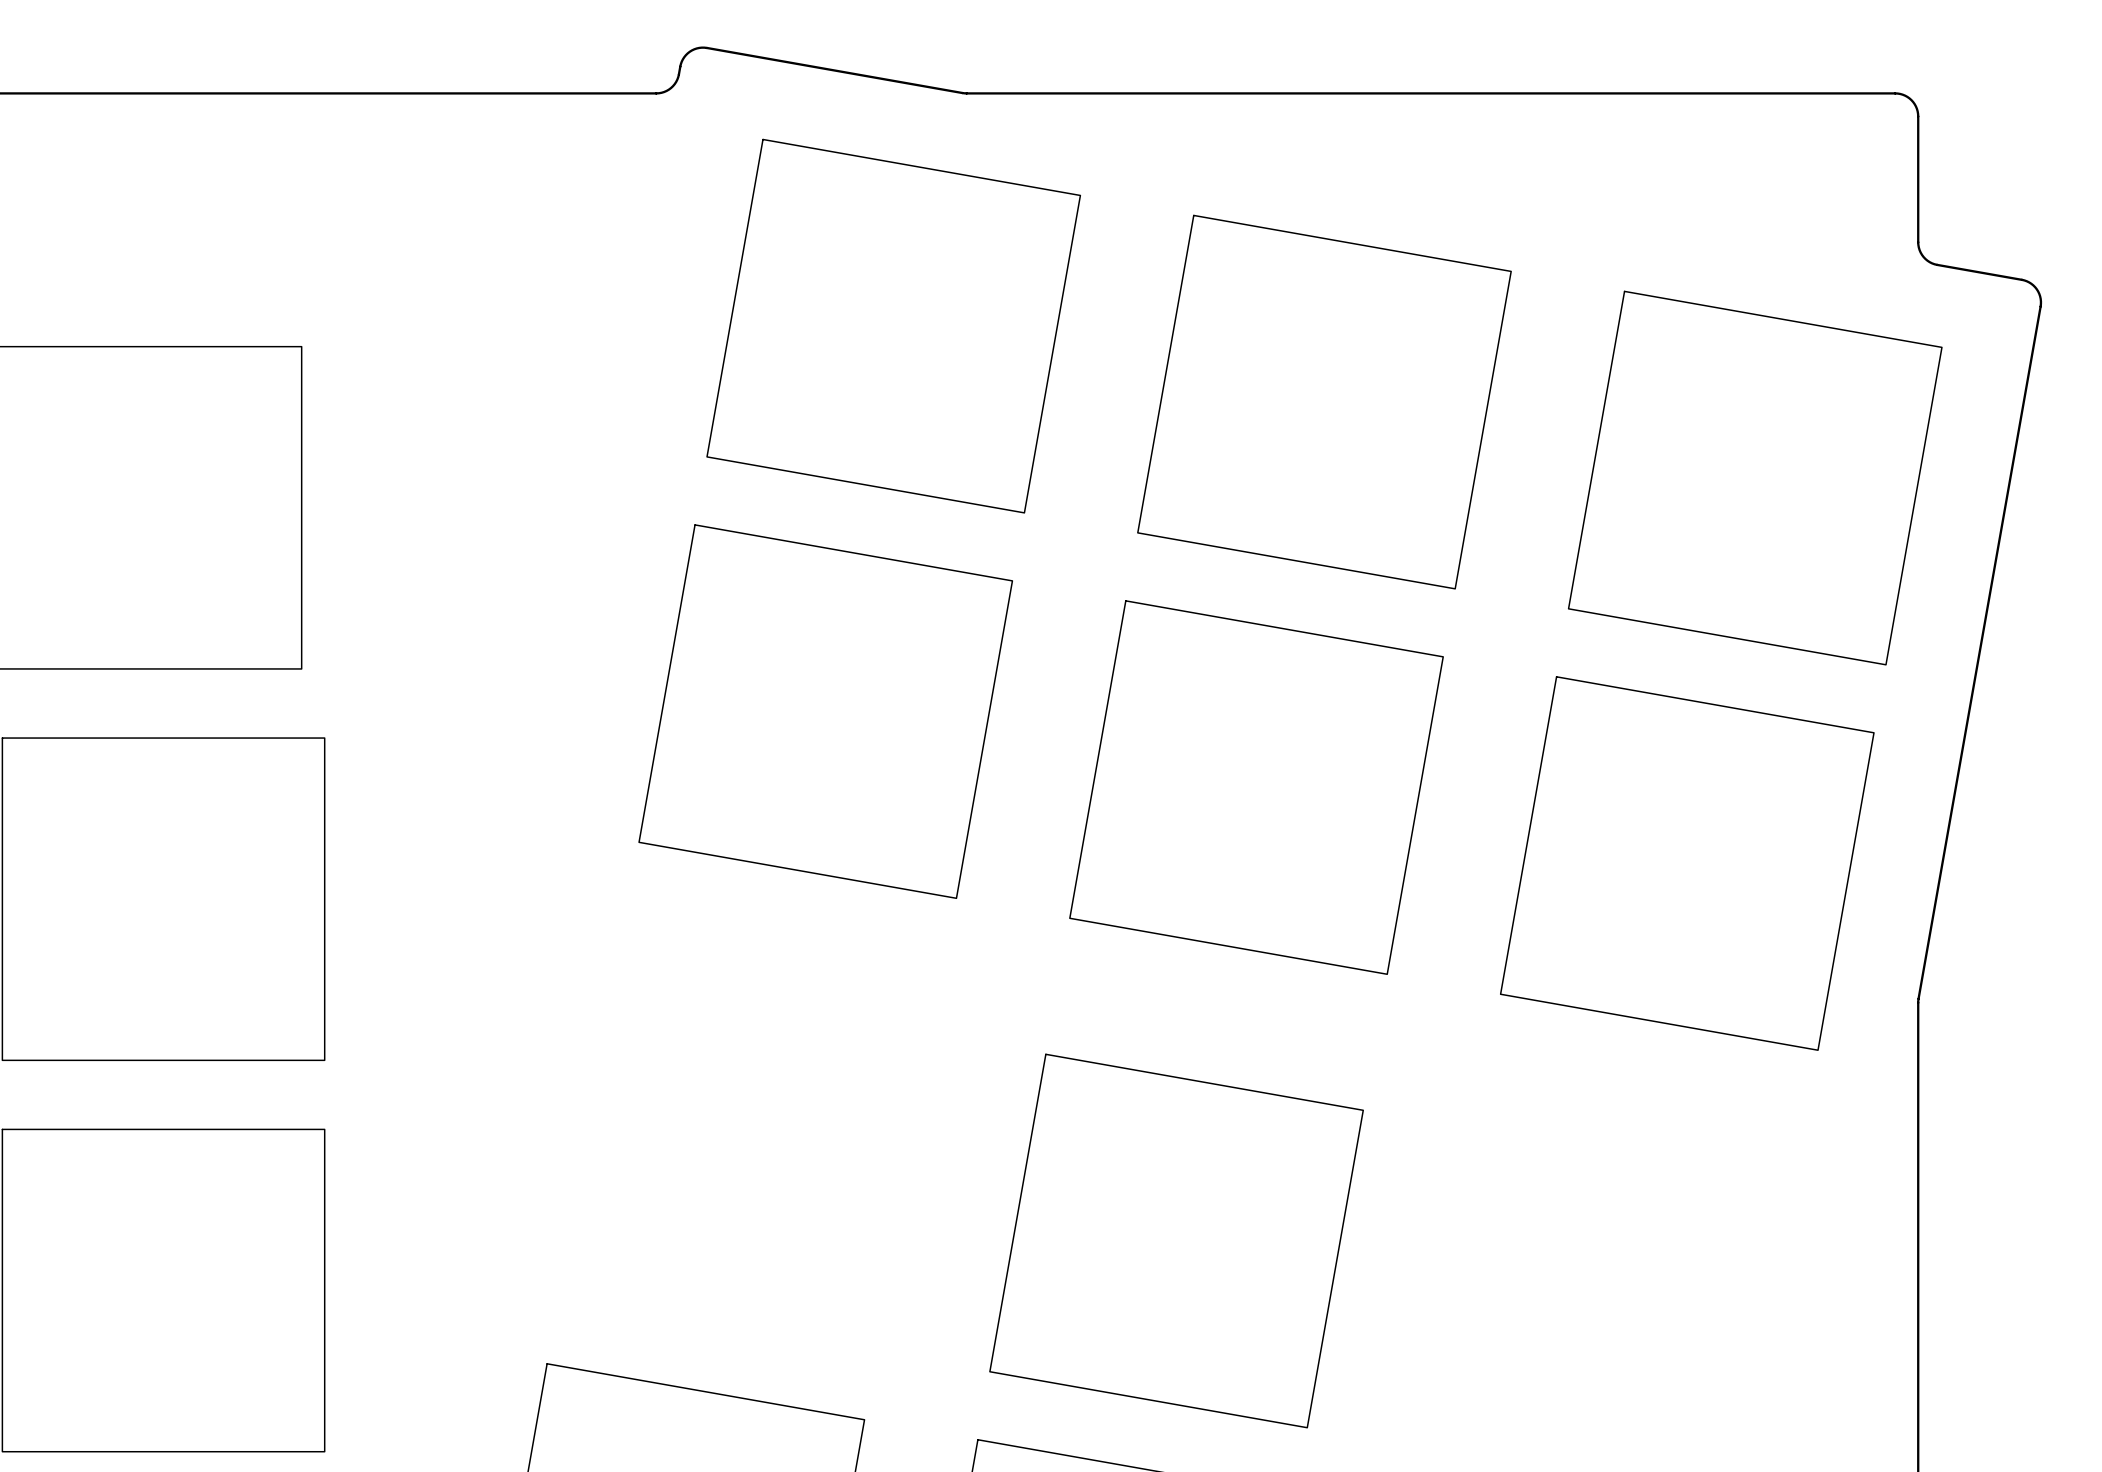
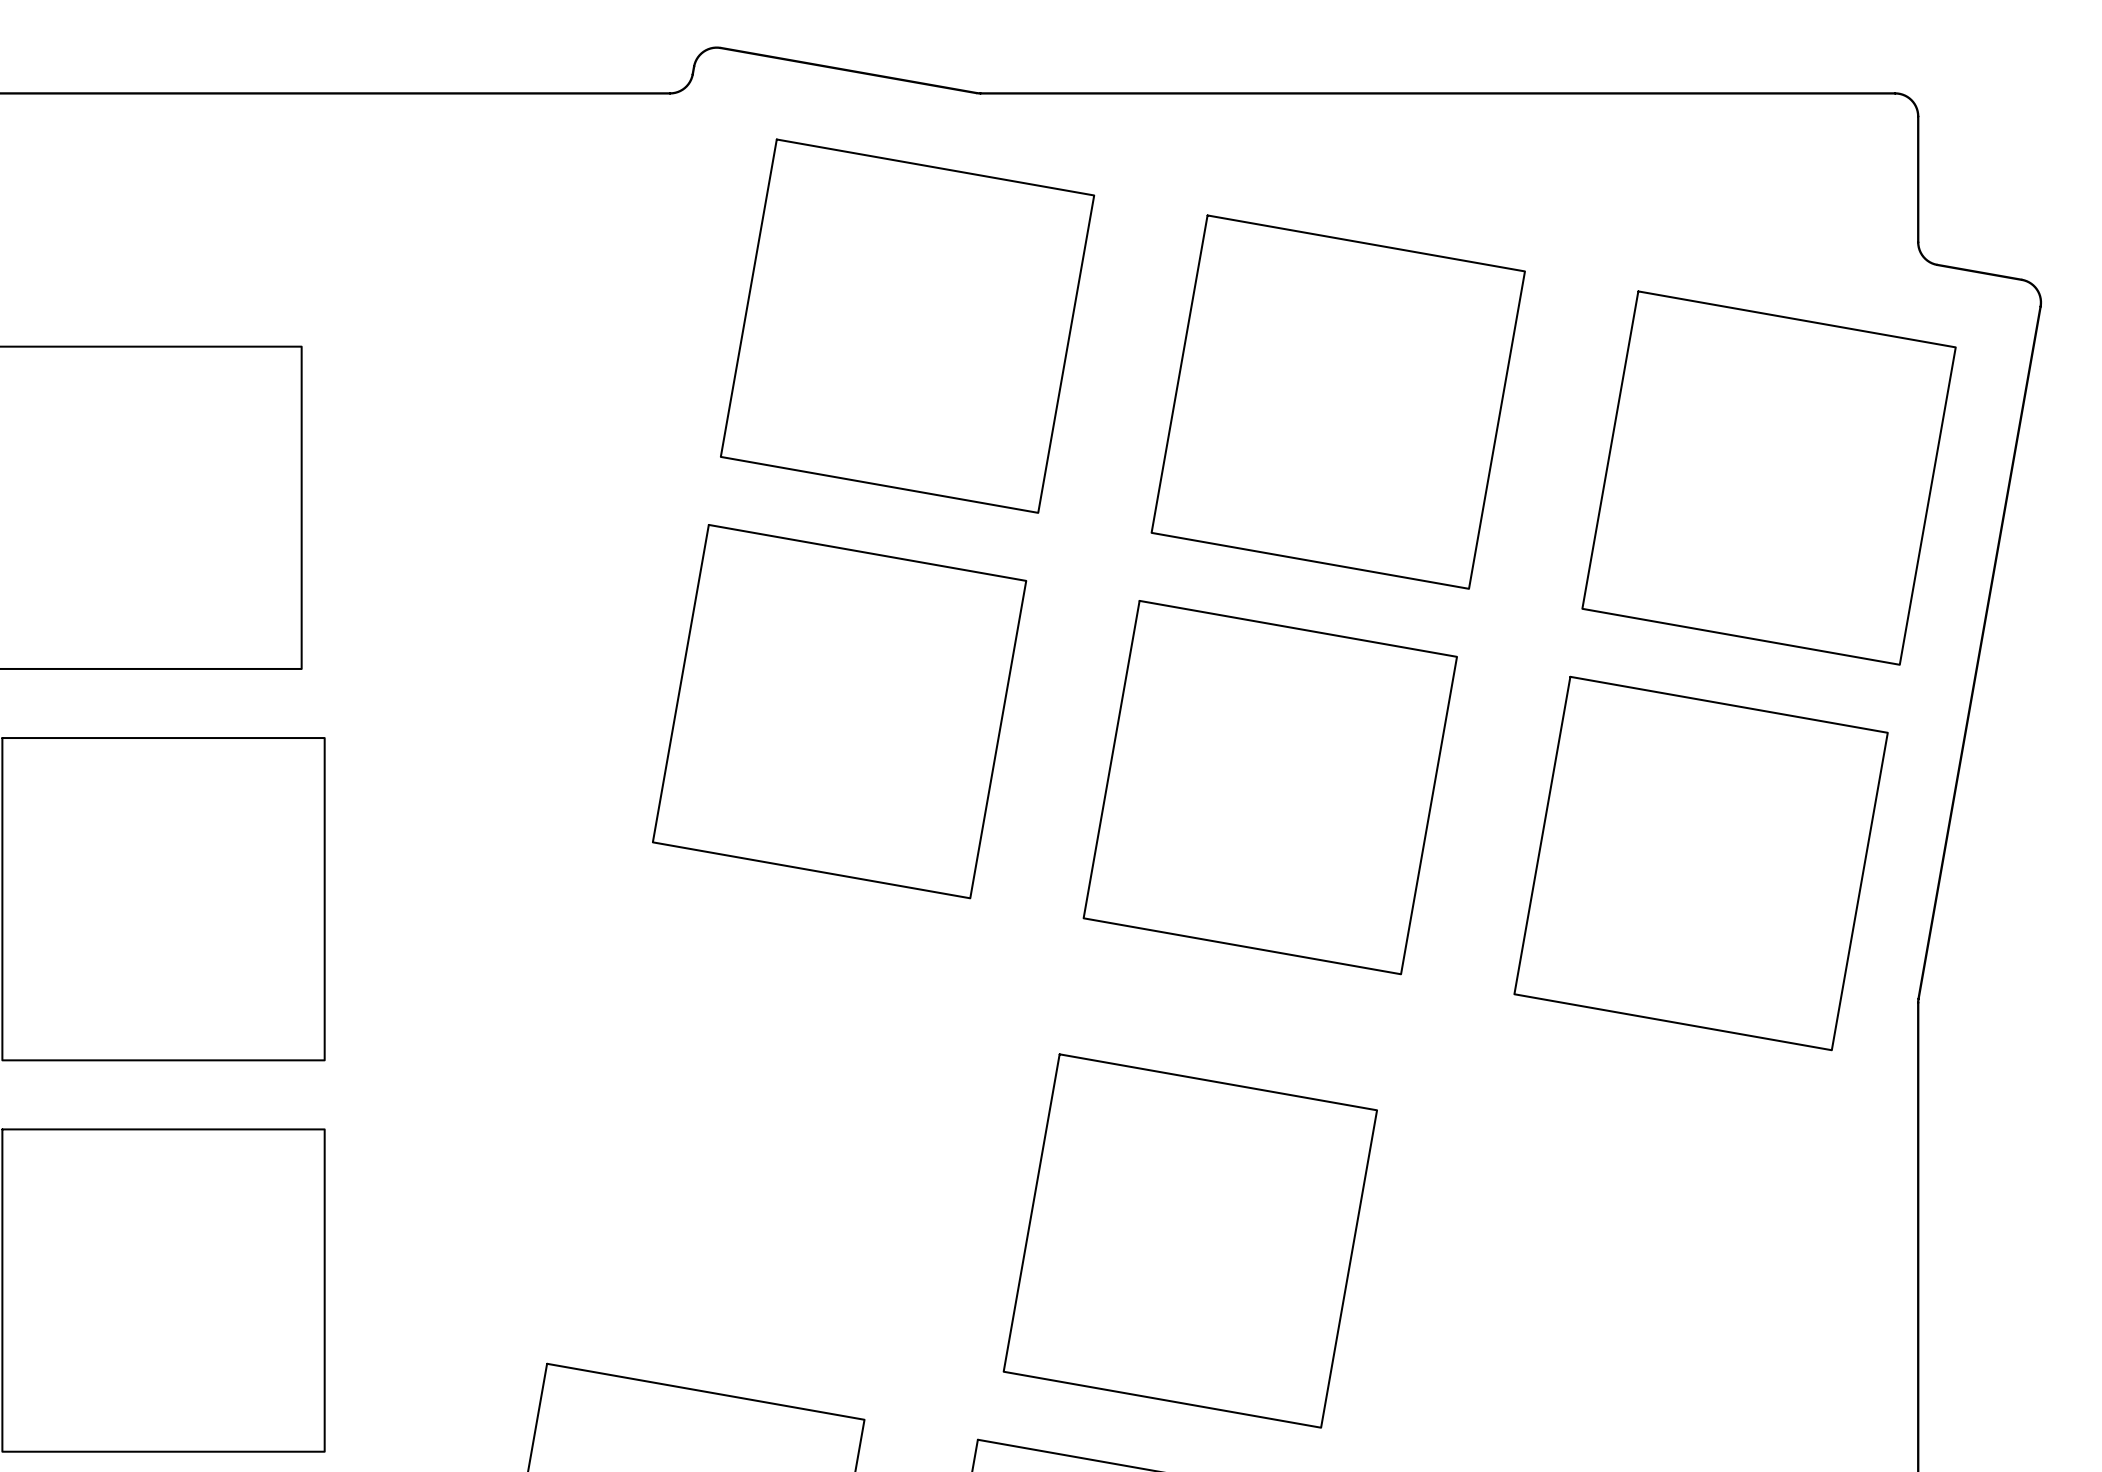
board edge: (656, 93) (664, 92) (673, 86) (677, 79) (684, 57) (691, 50) (701, 47) (962, 93) (980, 93) -> (656, 93) (675, 92) (684, 88) (691, 79) (698, 57) (705, 50) (715, 47) (980, 93)
drawing position: (893, 326) -> (907, 326)
drawing position: (1324, 402) -> (1338, 402)
drawing position: (1755, 478) -> (1769, 478)
drawing position: (825, 711) -> (839, 711)
drawing position: (1256, 787) -> (1270, 787)
drawing position: (1687, 863) -> (1701, 863)
drawing position: (1176, 1241) -> (1190, 1241)

